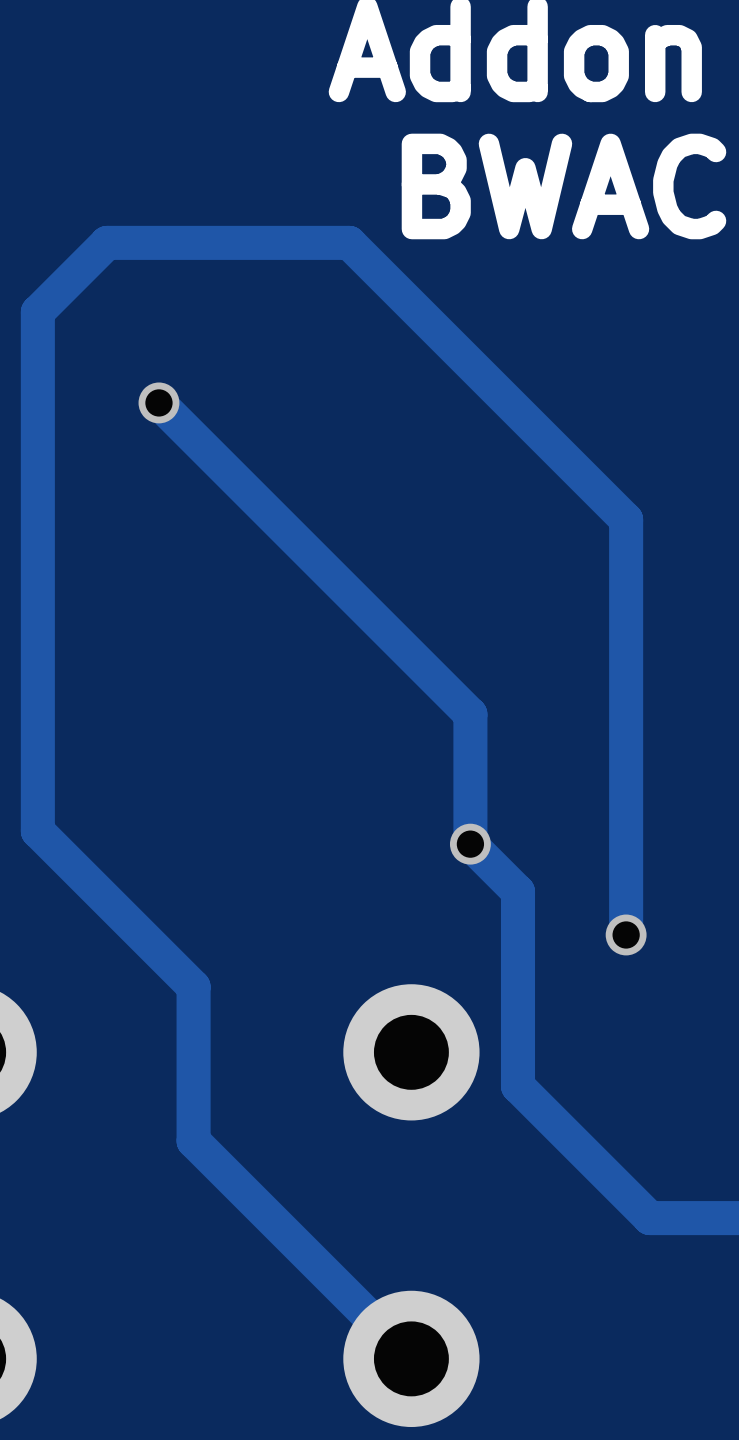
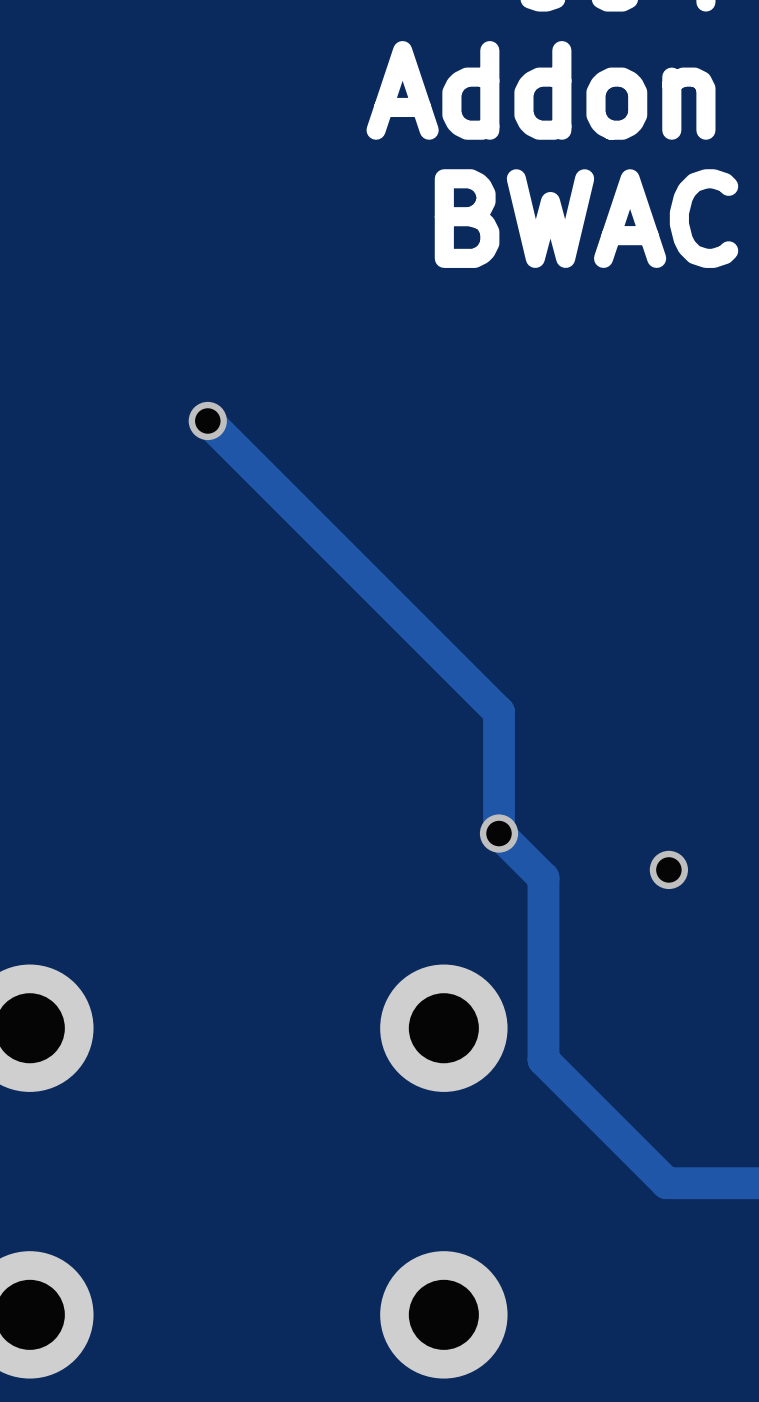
track: (626, 934) (626, 519) (349, 242) (107, 242) (37, 312) (37, 831) (193, 986) (193, 1141) (411, 1358) -> none
via position: (626, 934) -> (668, 869)

